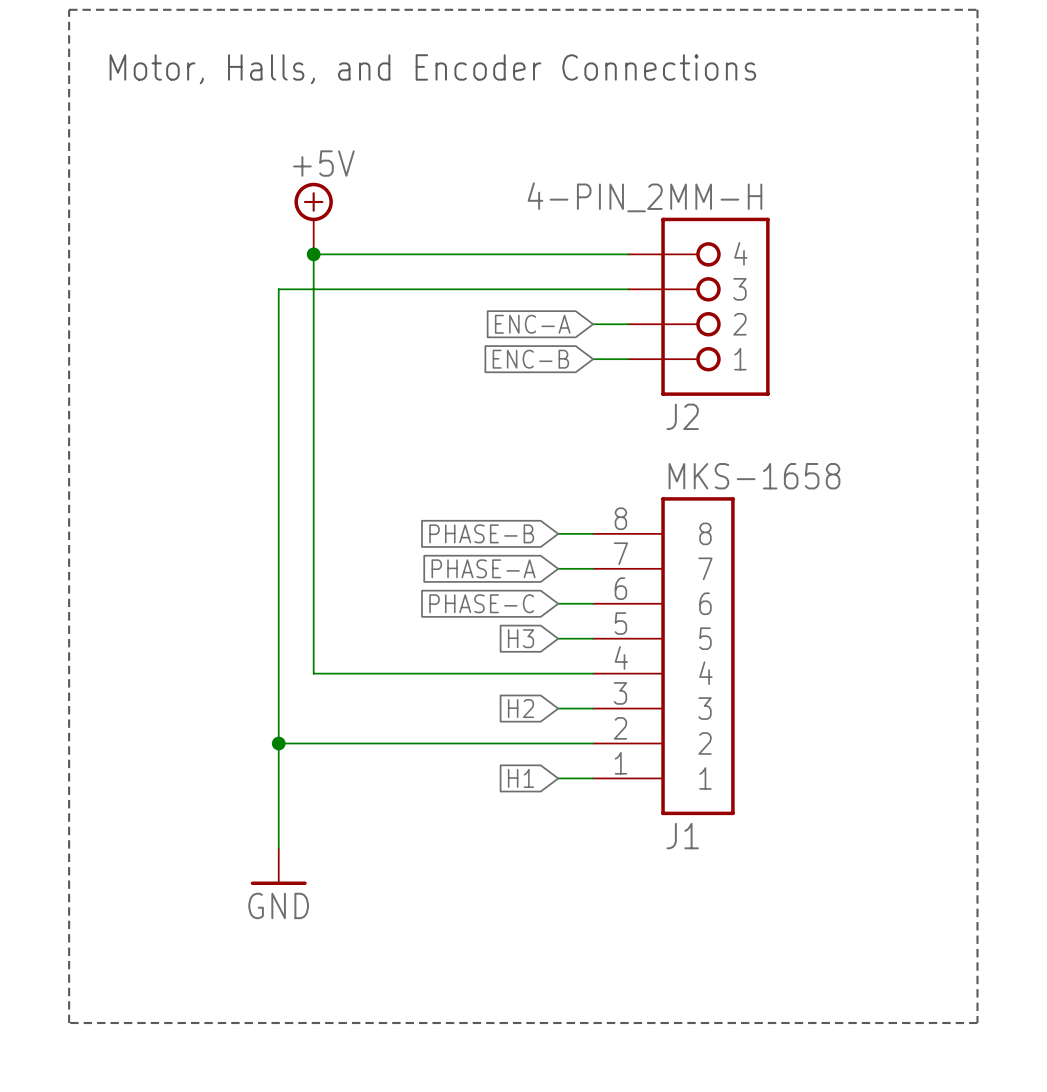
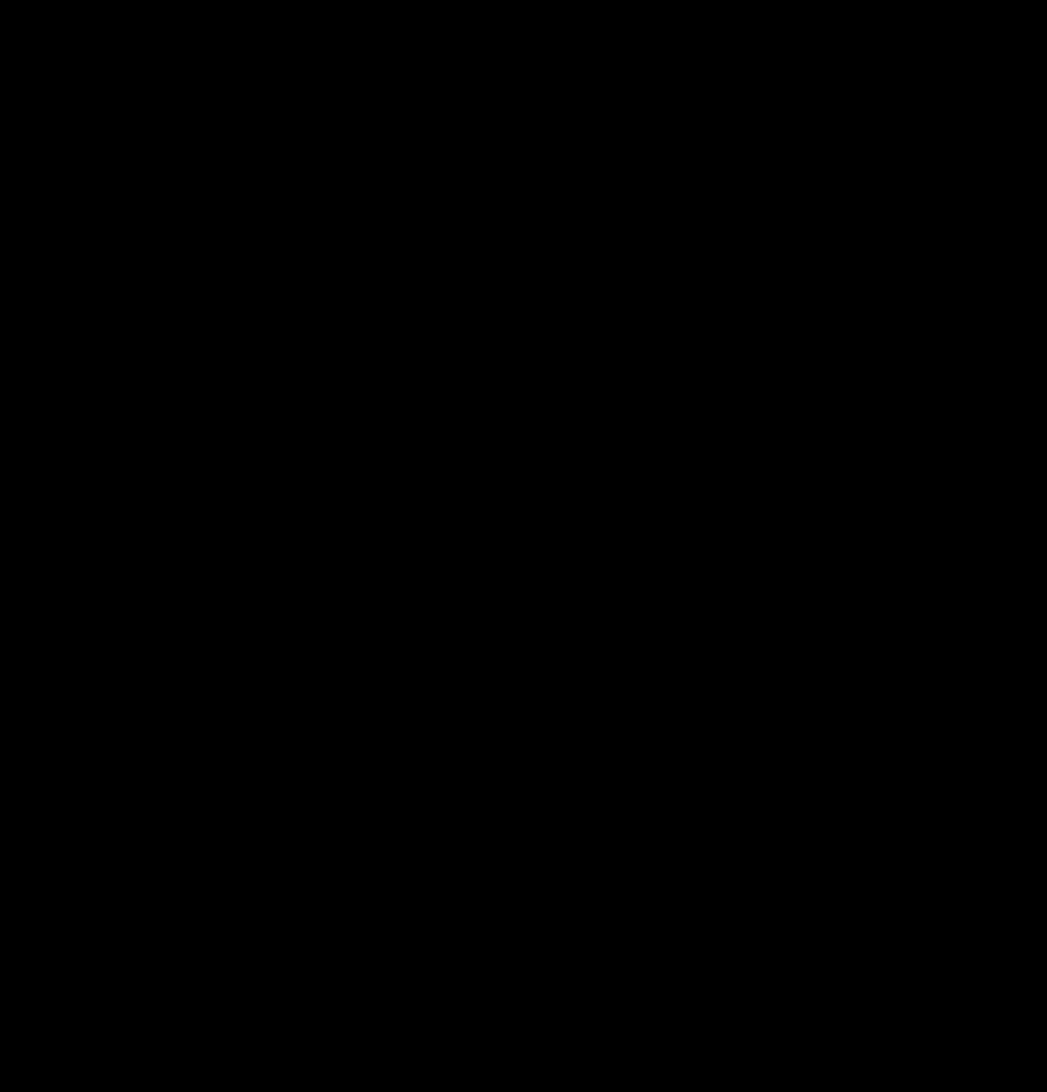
line: (69, 9) (977, 9) (977, 1023) (69, 1023) (69, 9) -> none
text: Motor, Halls, and Encoder Connections (432, 69) -> none
power symbol: +5V (313, 218) -> none
junction: (313, 254) -> none
wire: (628, 254) (313, 254) (313, 673) (593, 673) -> none
wire: (628, 289) (278, 289) (278, 848) -> none
J2: 4-PIN_2MM-H (698, 306) -> none
global label: ENC-A (532, 324) -> none
wire: (593, 324) (628, 324) -> none
global label: ENC-B (530, 359) -> none
wire: (593, 359) (628, 359) -> none
global label: PHASE-B (481, 533) -> none
wire: (558, 533) (593, 533) -> none
global label: PHASE-A (483, 568) -> none
wire: (558, 568) (593, 568) -> none
global label: PHASE-C (481, 603) -> none
wire: (558, 603) (593, 603) -> none
global label: H3 (521, 638) -> none
wire: (558, 638) (593, 638) -> none
J1: MKS-1658 (663, 656) -> none
global label: H2 (521, 708) -> none
wire: (558, 708) (593, 708) -> none
wire: (278, 743) (593, 743) -> none
junction: (278, 743) -> none
global label: H1 (521, 778) -> none
wire: (558, 778) (593, 778) -> none
power symbol: GND (278, 866) -> none

